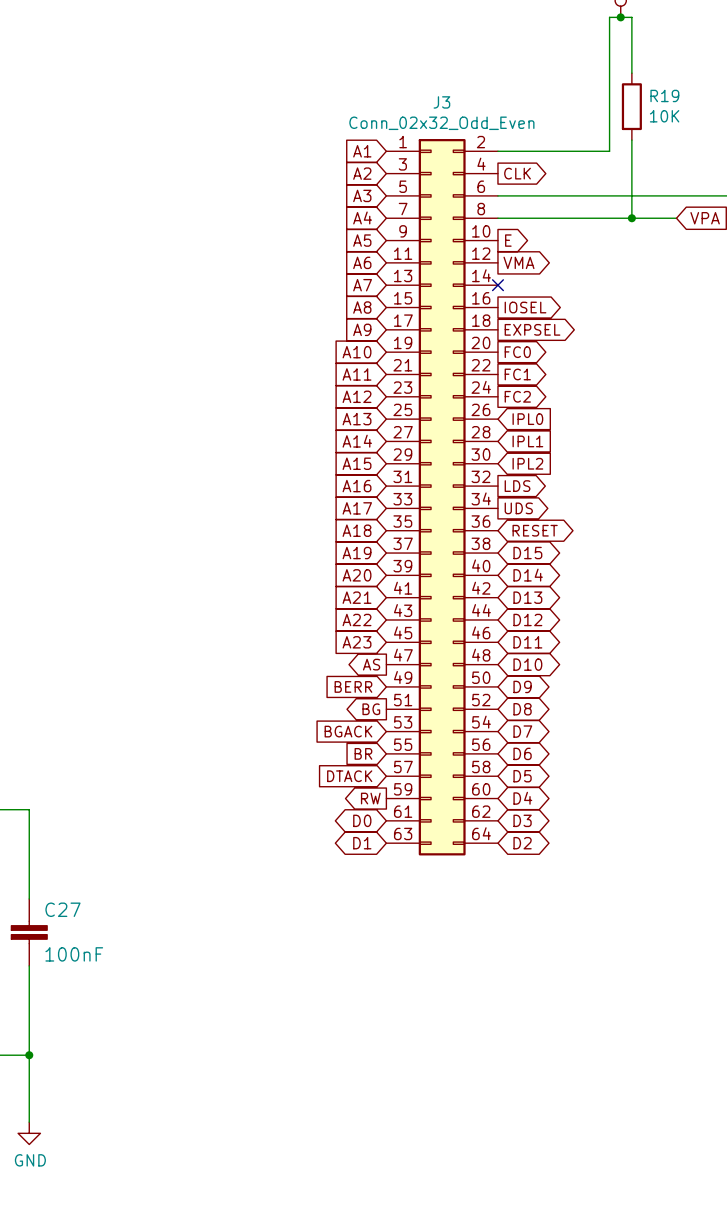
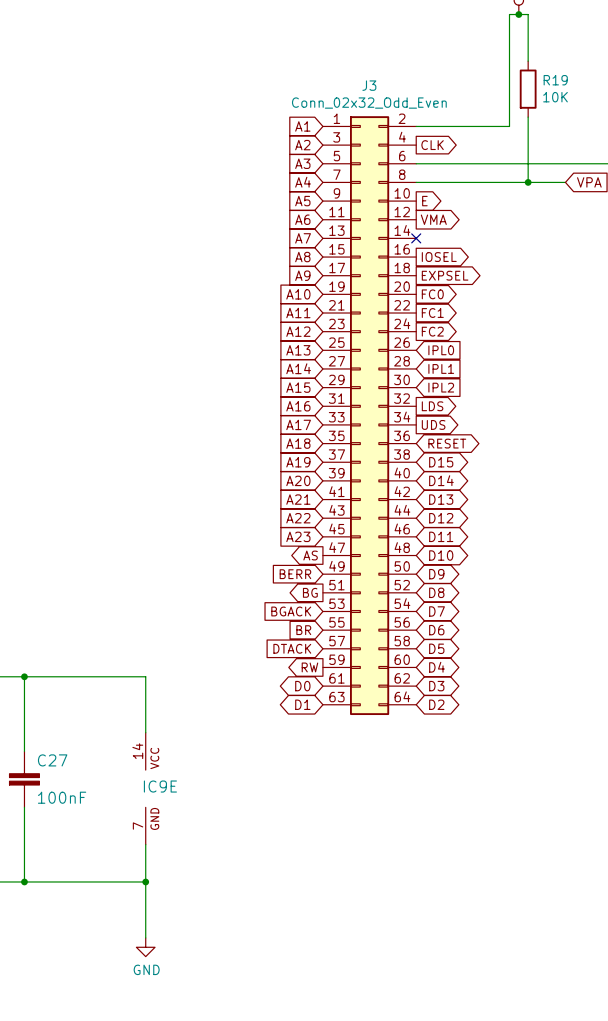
wire: none -> (24, 676) (145, 676) (145, 732)
junction: none -> (24, 676)
IC9E: none -> (145, 788)
wire: none -> (145, 844) (145, 937)
wire: (29, 1055) (29, 1122) -> (24, 881) (145, 881)
junction: none -> (145, 881)
power symbol position: GND (29, 1133) -> GND (145, 947)

